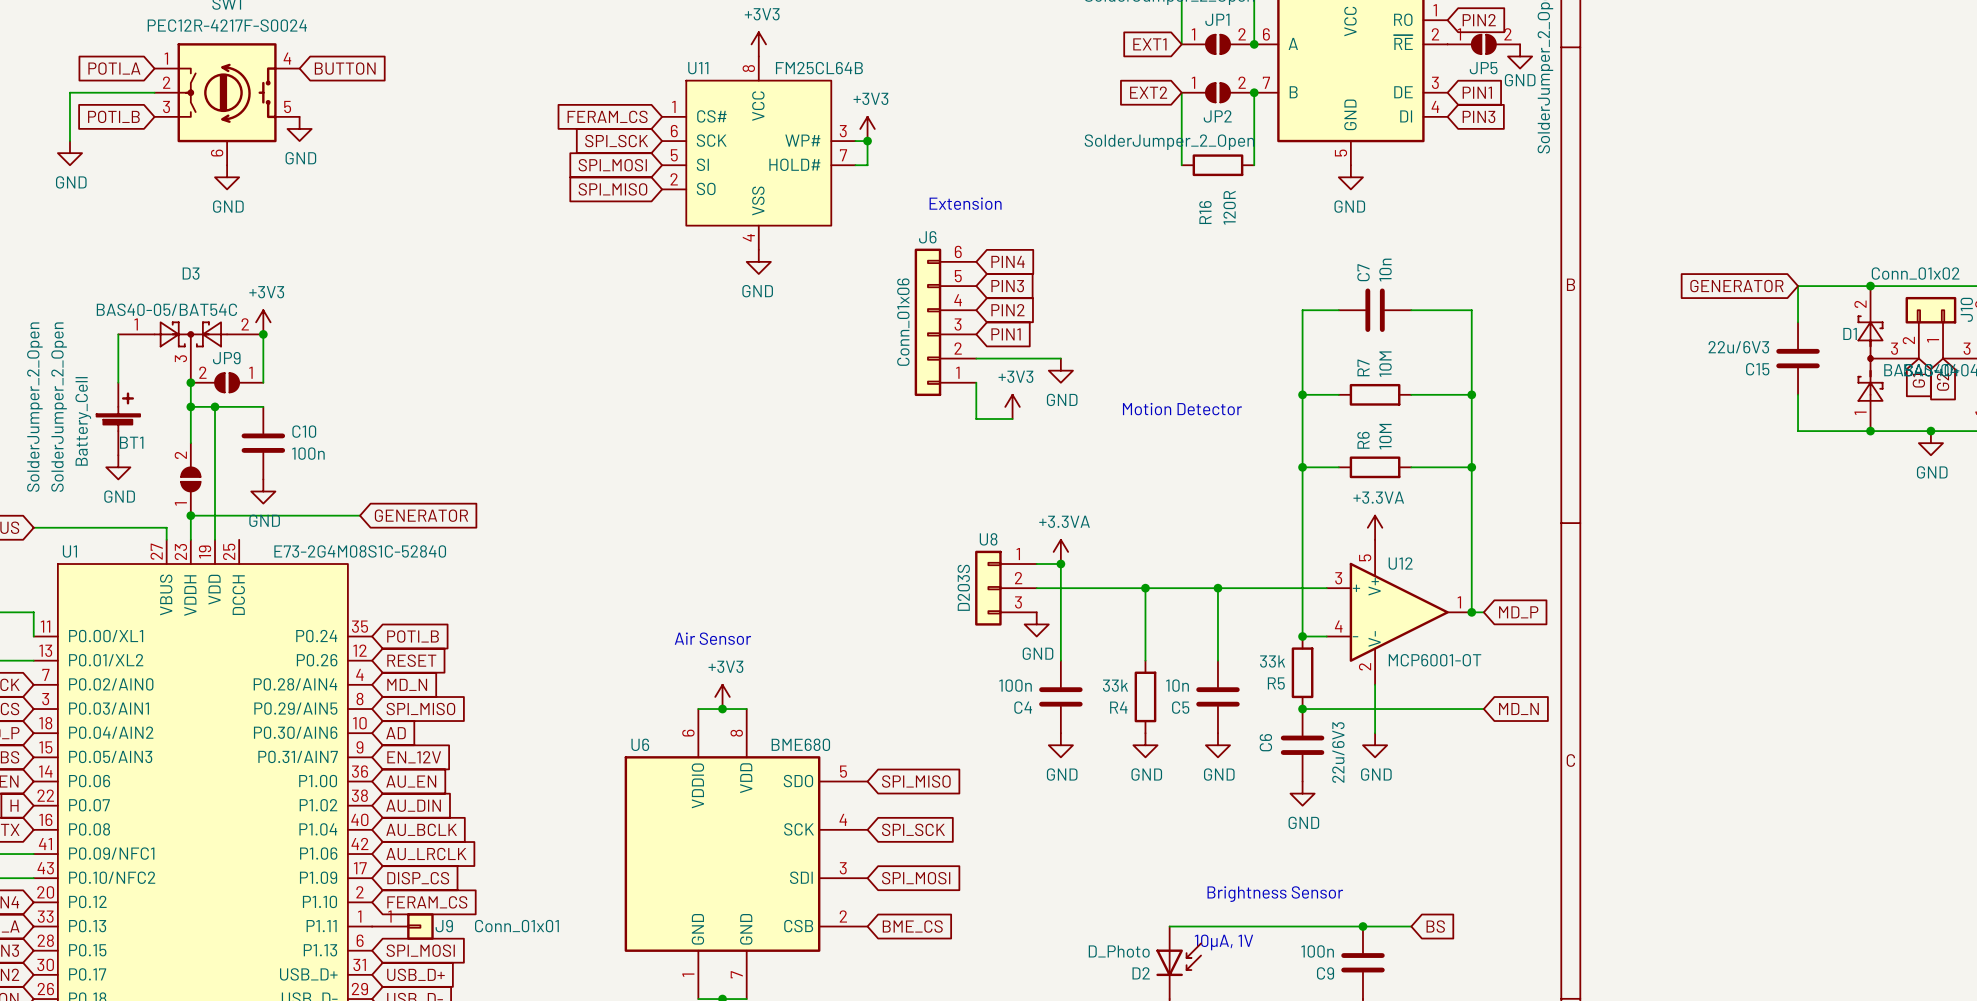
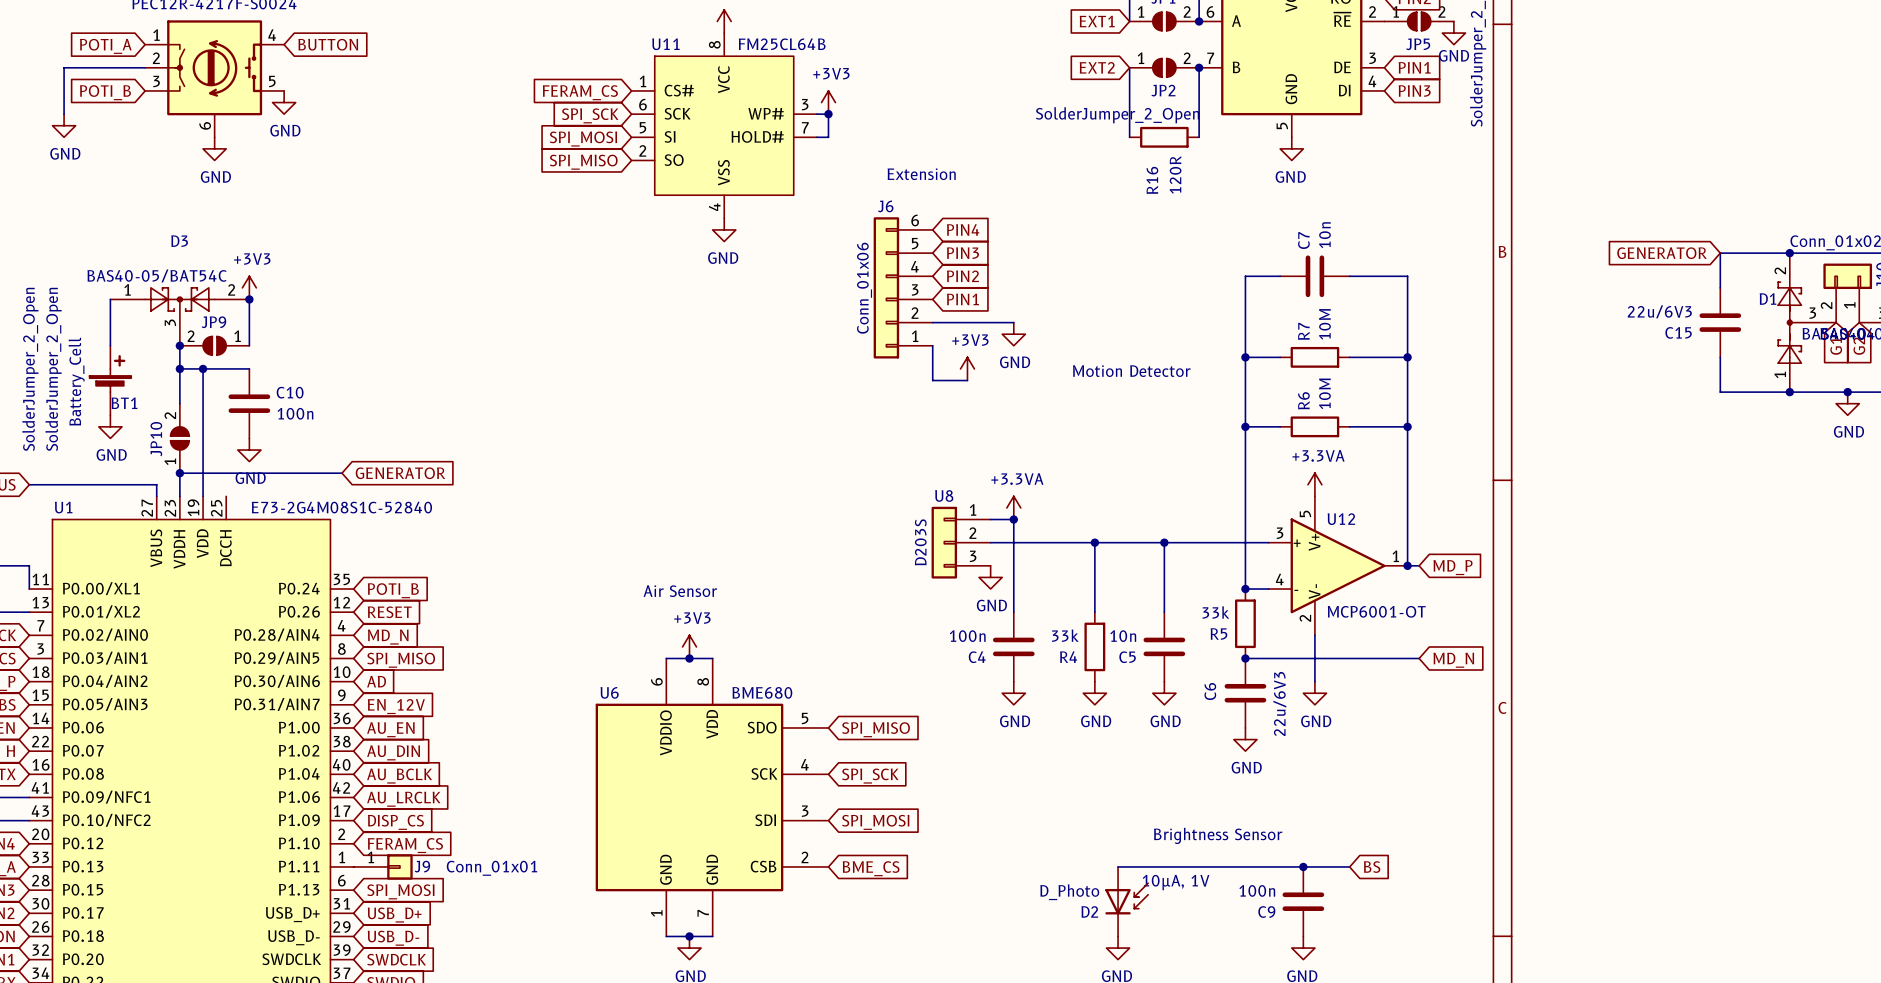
JP10 name: none -> JP10 (156, 439)

